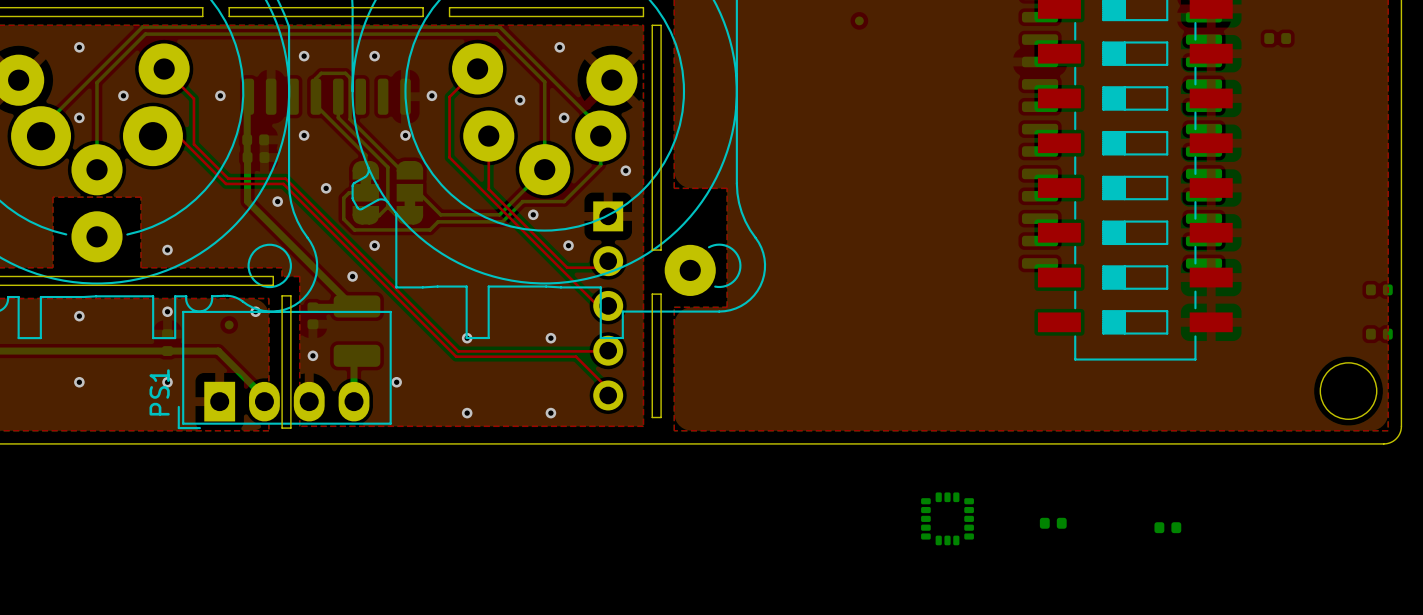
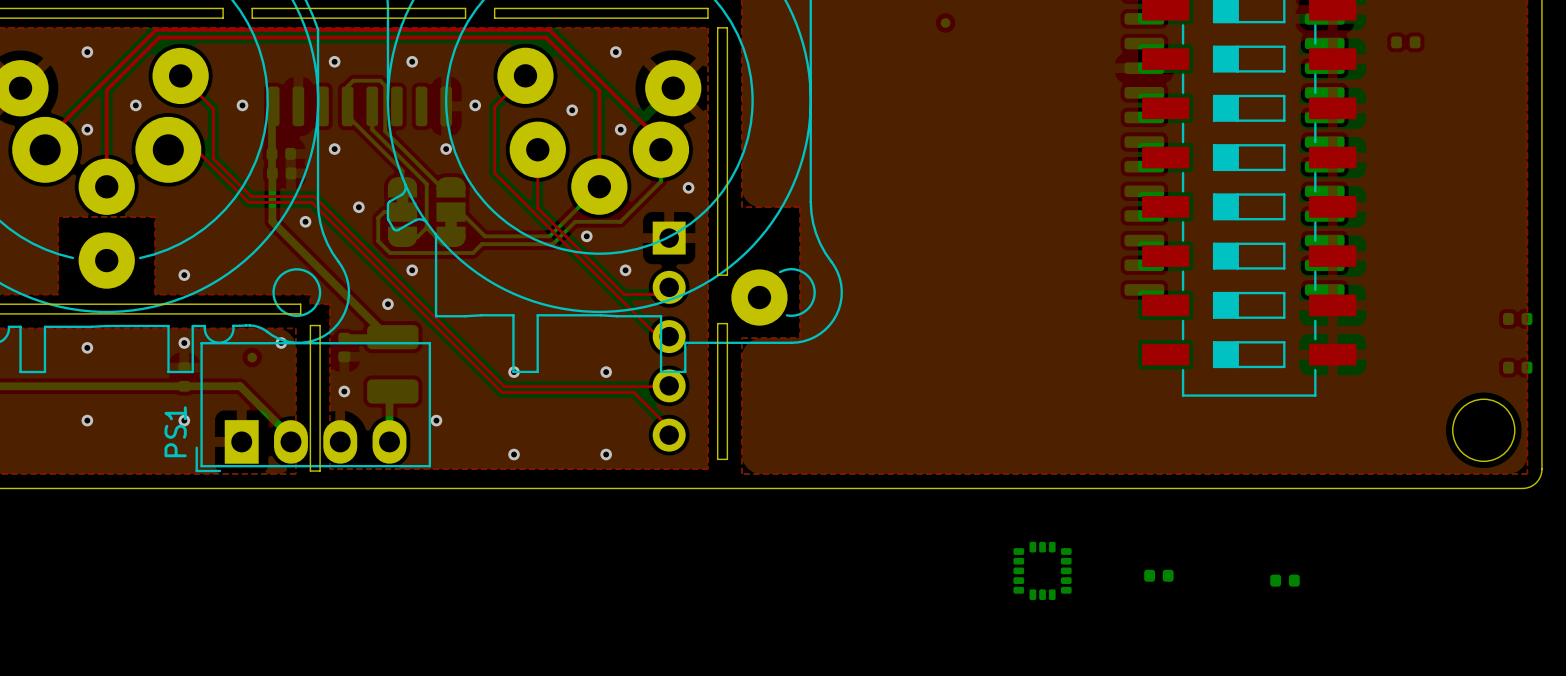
top track: none -> (45, 140) (156, 29) (549, 29) (660, 141)
bottom track: (600, 127) (499, 27) (142, 27) (41, 128) -> none
bottom track: (97, 169) (97, 82) (145, 34) (496, 34) (544, 81) (544, 169) -> none
top track: none -> (106, 186) (106, 90) (159, 37) (546, 37) (599, 90) (599, 186)

